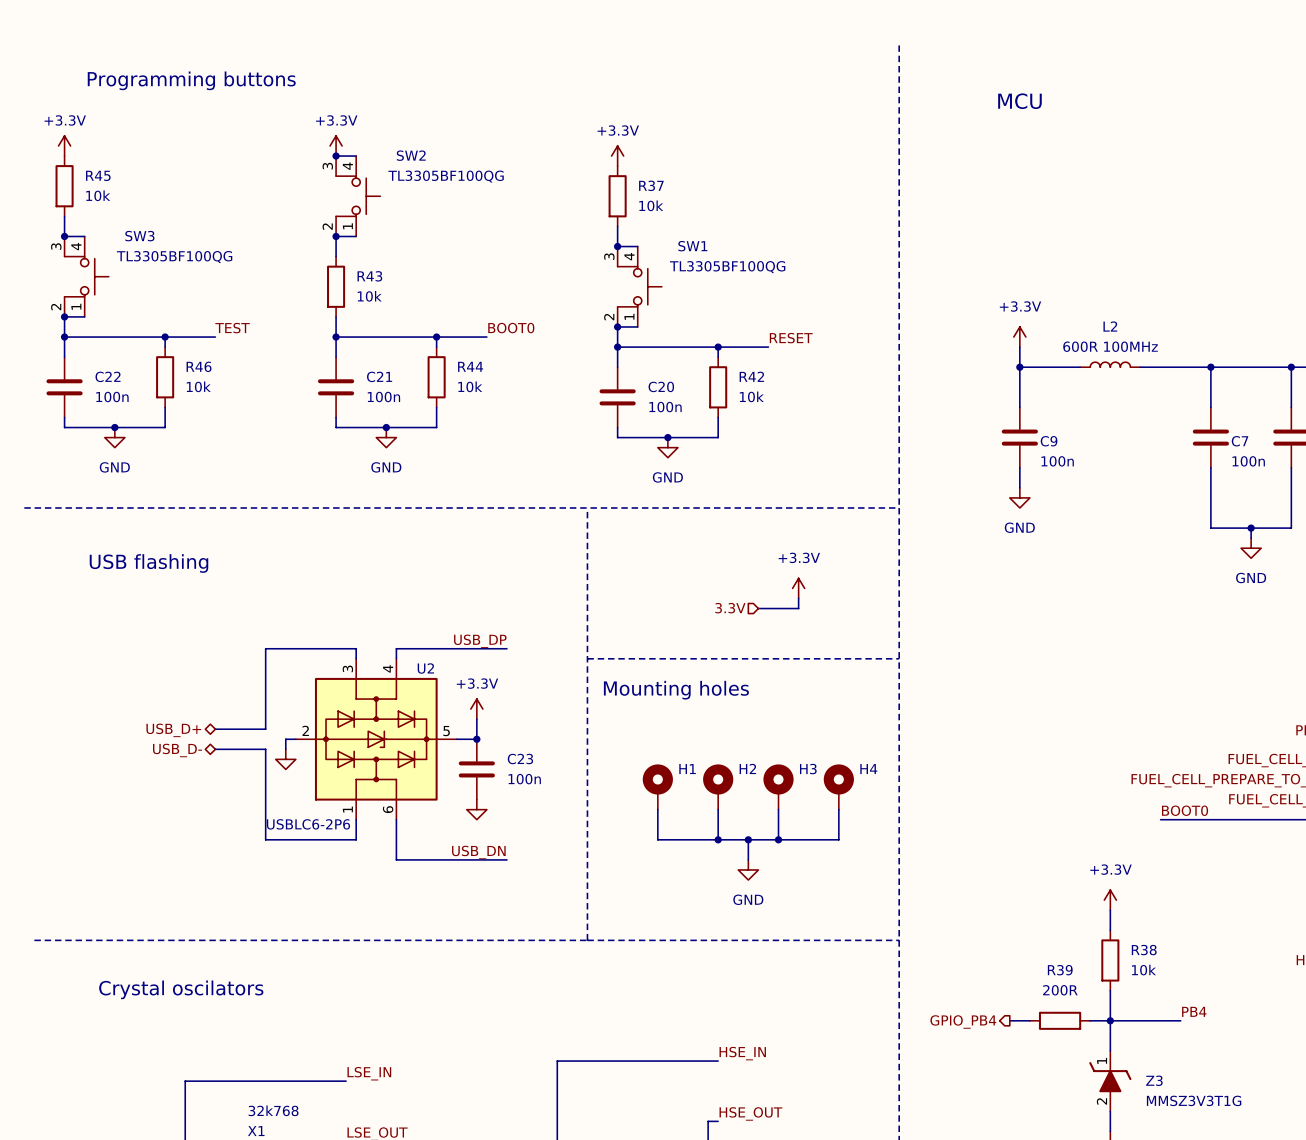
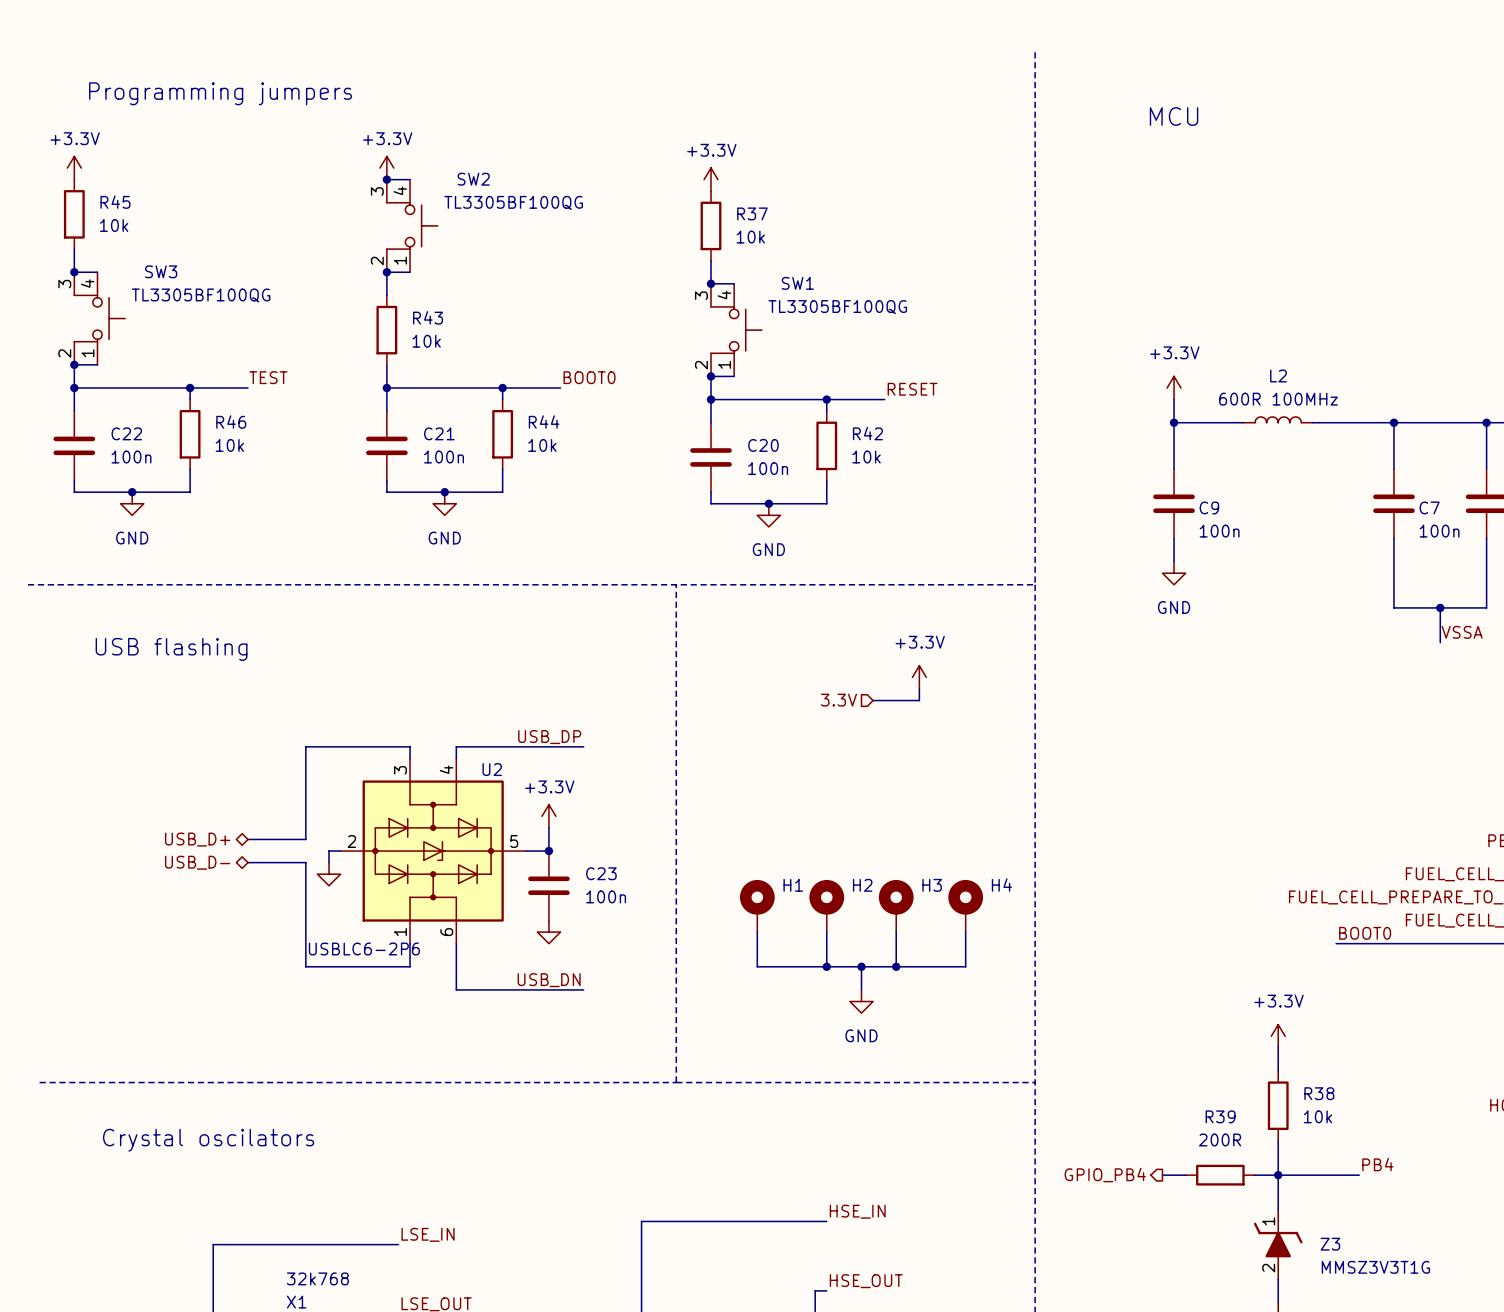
text: Programming buttons (191, 80) -> Programming jumpers (220, 93)
power symbol: GND (1251, 548) -> none
label: none -> VSSA (1462, 632)
line: (587, 658) (899, 658) -> none
text: Mounting holes (676, 690) -> none

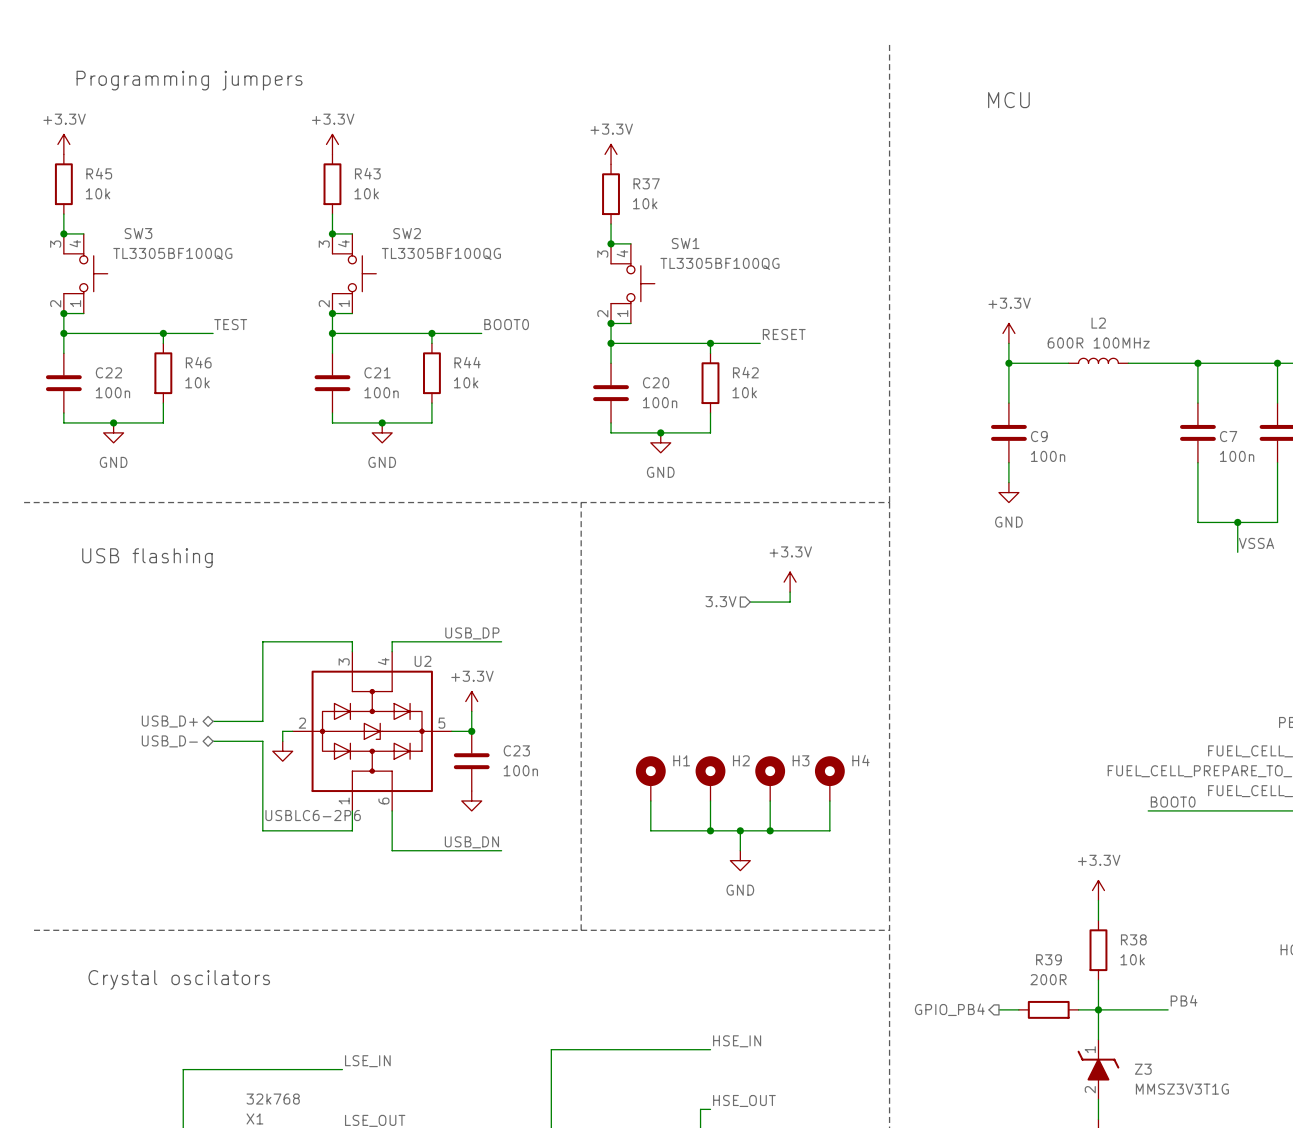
wire: (386, 179) (410, 179) -> (332, 313) (352, 313)
junction: (386, 179) -> none
SW2 position: (412, 225) -> (354, 273)
R43 position: (386, 330) -> (332, 184)
junction: none -> (332, 313)

